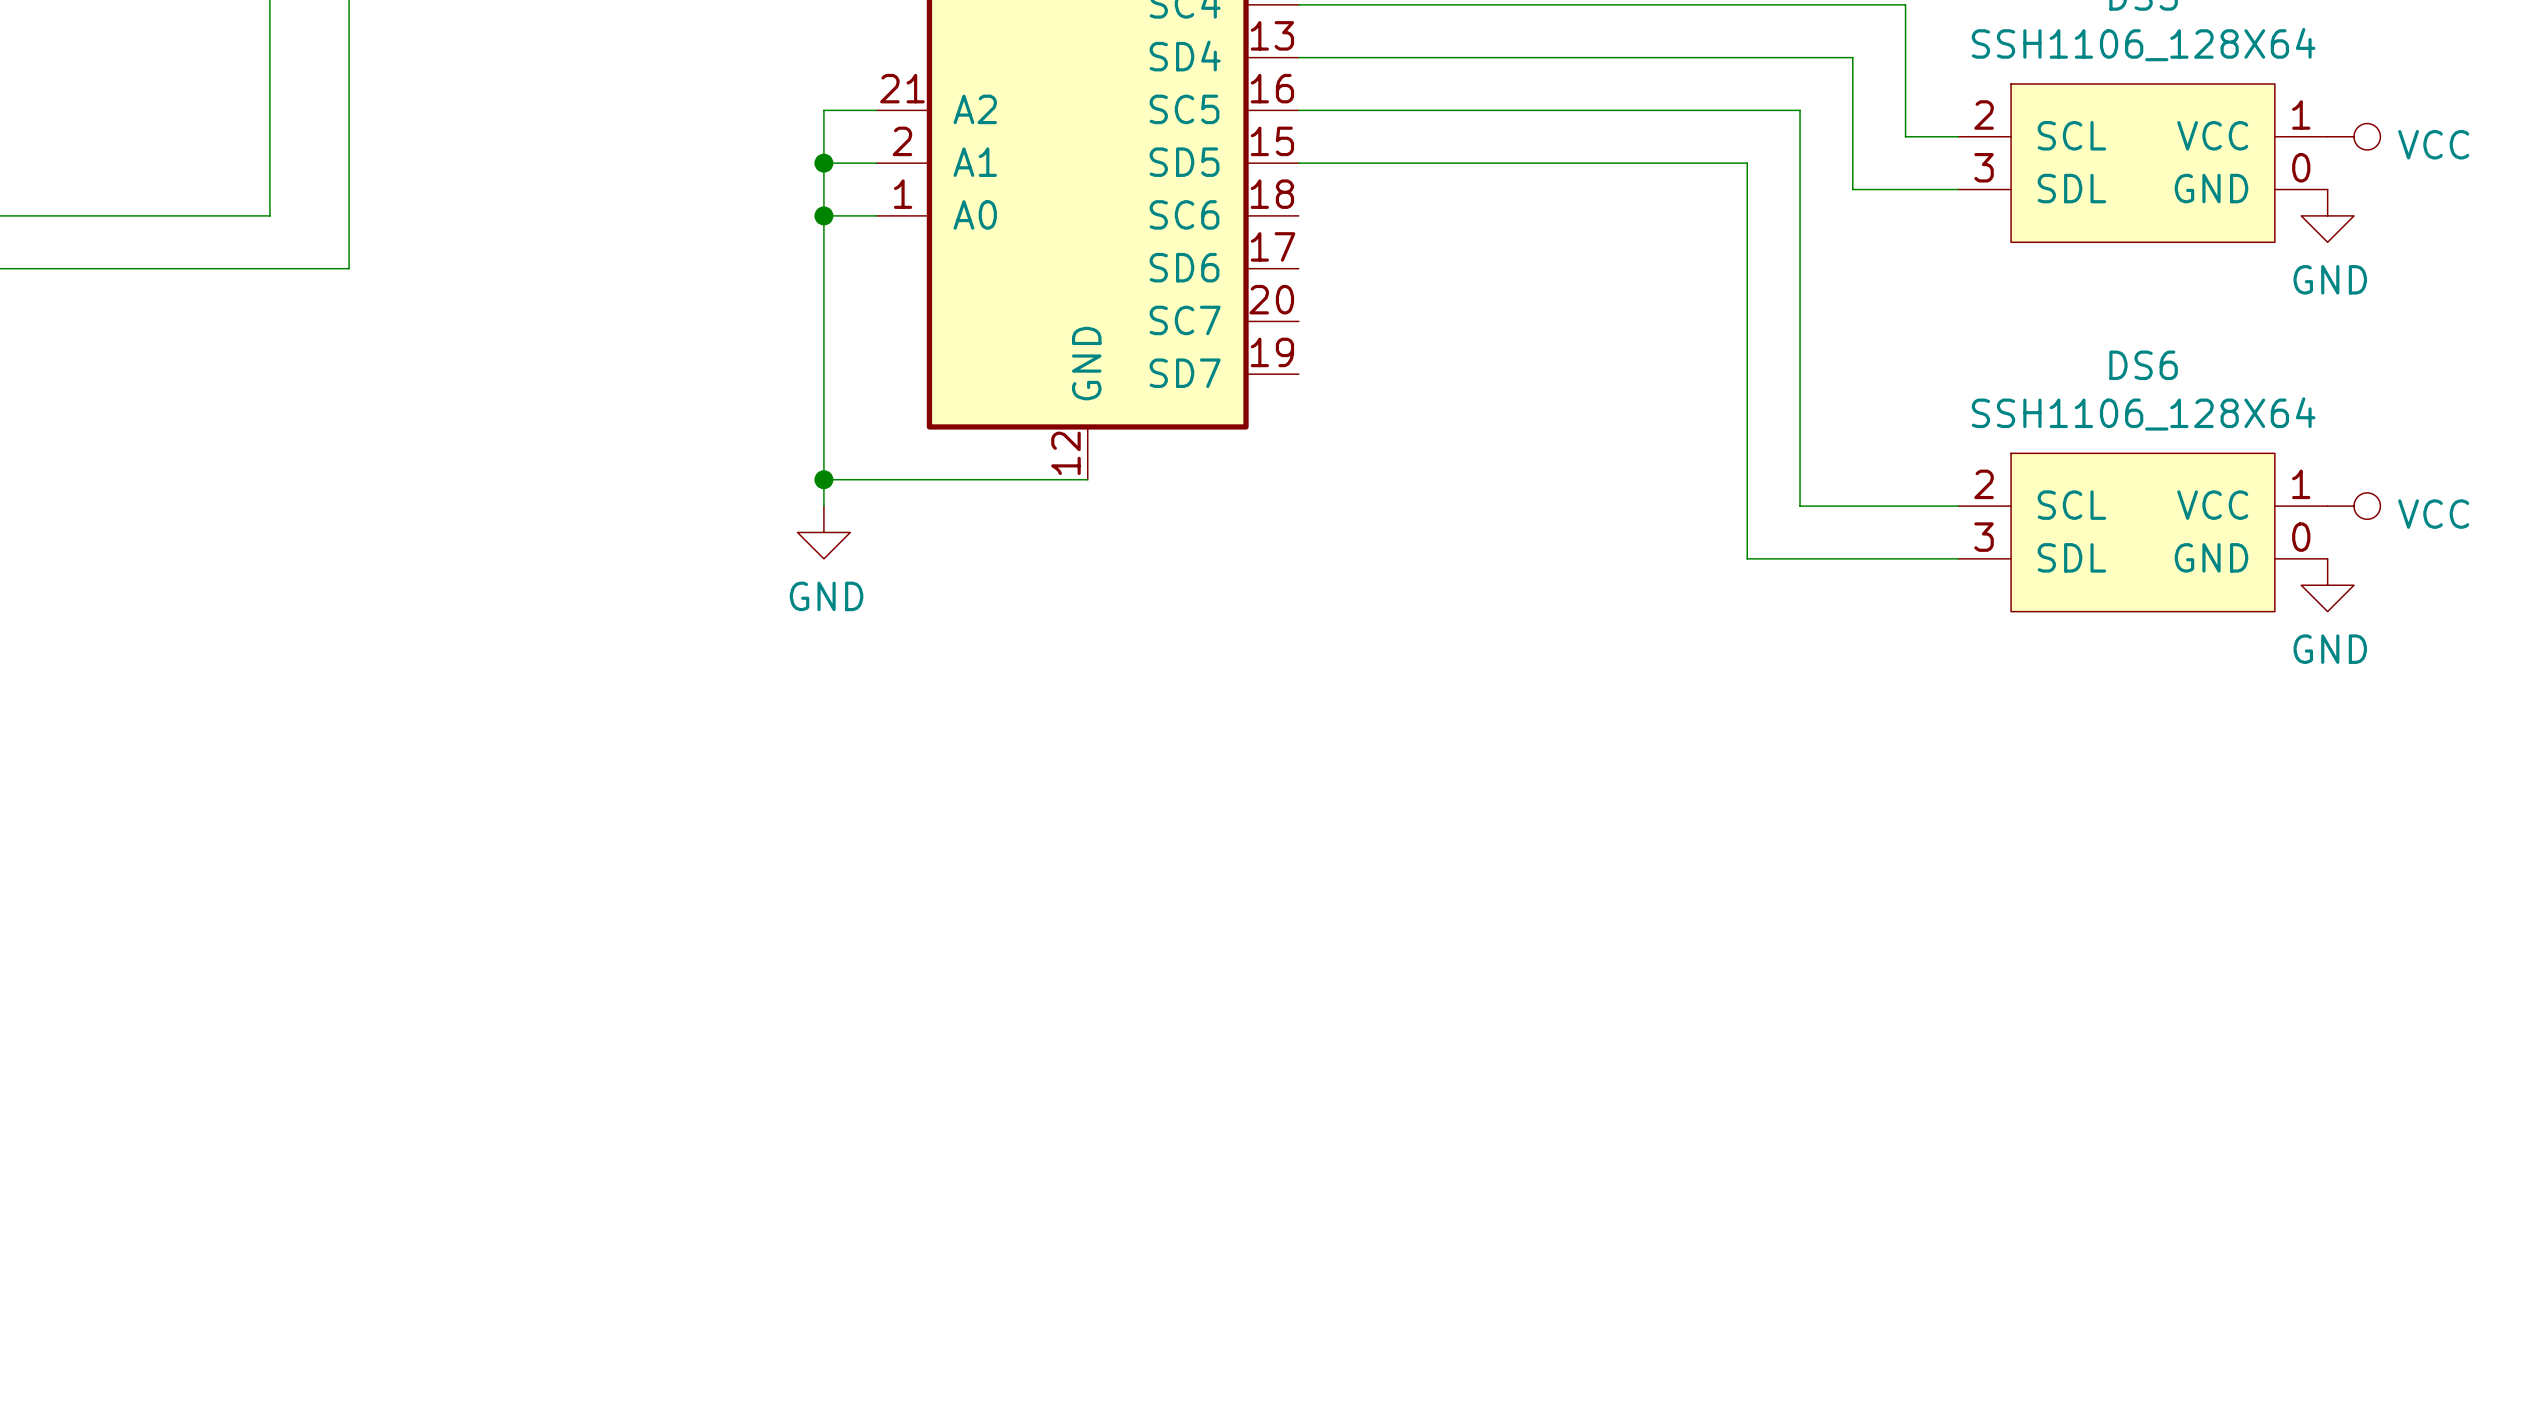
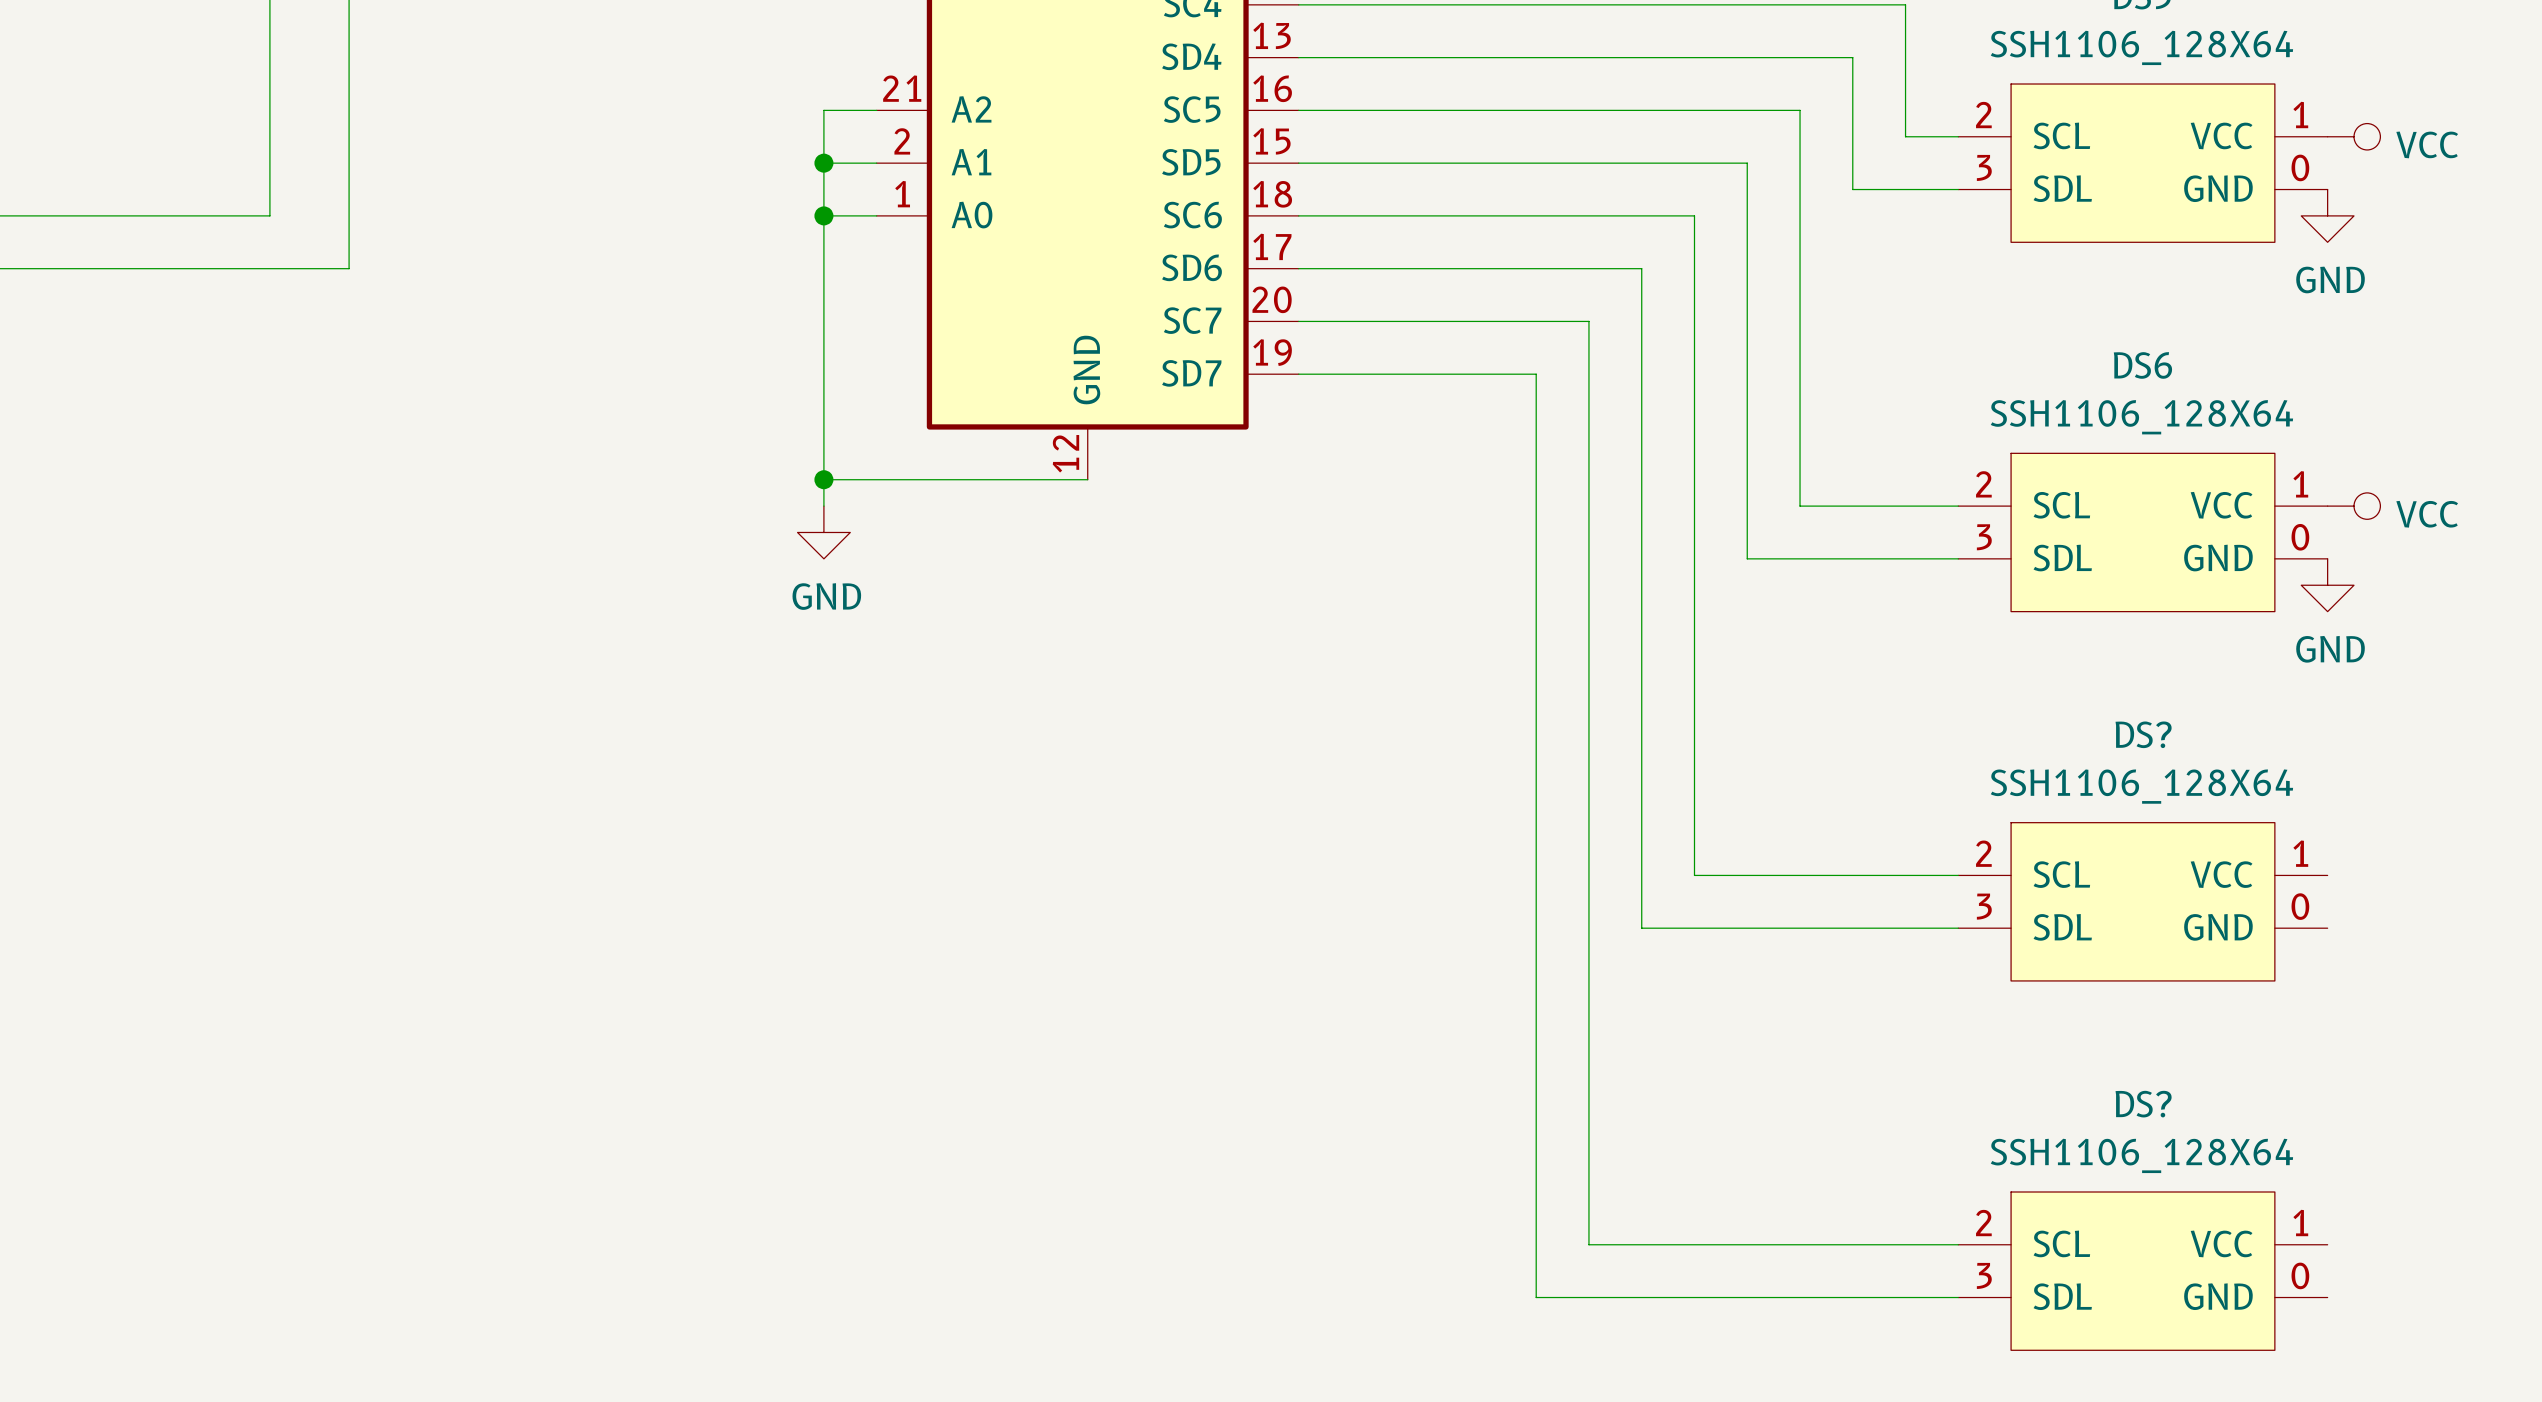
wire: none -> (1298, 215) (1694, 215) (1694, 875) (1958, 875)
wire: none -> (1298, 268) (1641, 268) (1641, 928) (1958, 928)
wire: none -> (1298, 321) (1588, 321) (1588, 1244) (1958, 1244)
wire: none -> (1298, 374) (1536, 374) (1536, 1297) (1958, 1297)
DS?: none -> SSH1106_128X64 (2142, 901)
DS?: none -> SSH1106_128X64 (2142, 1271)

